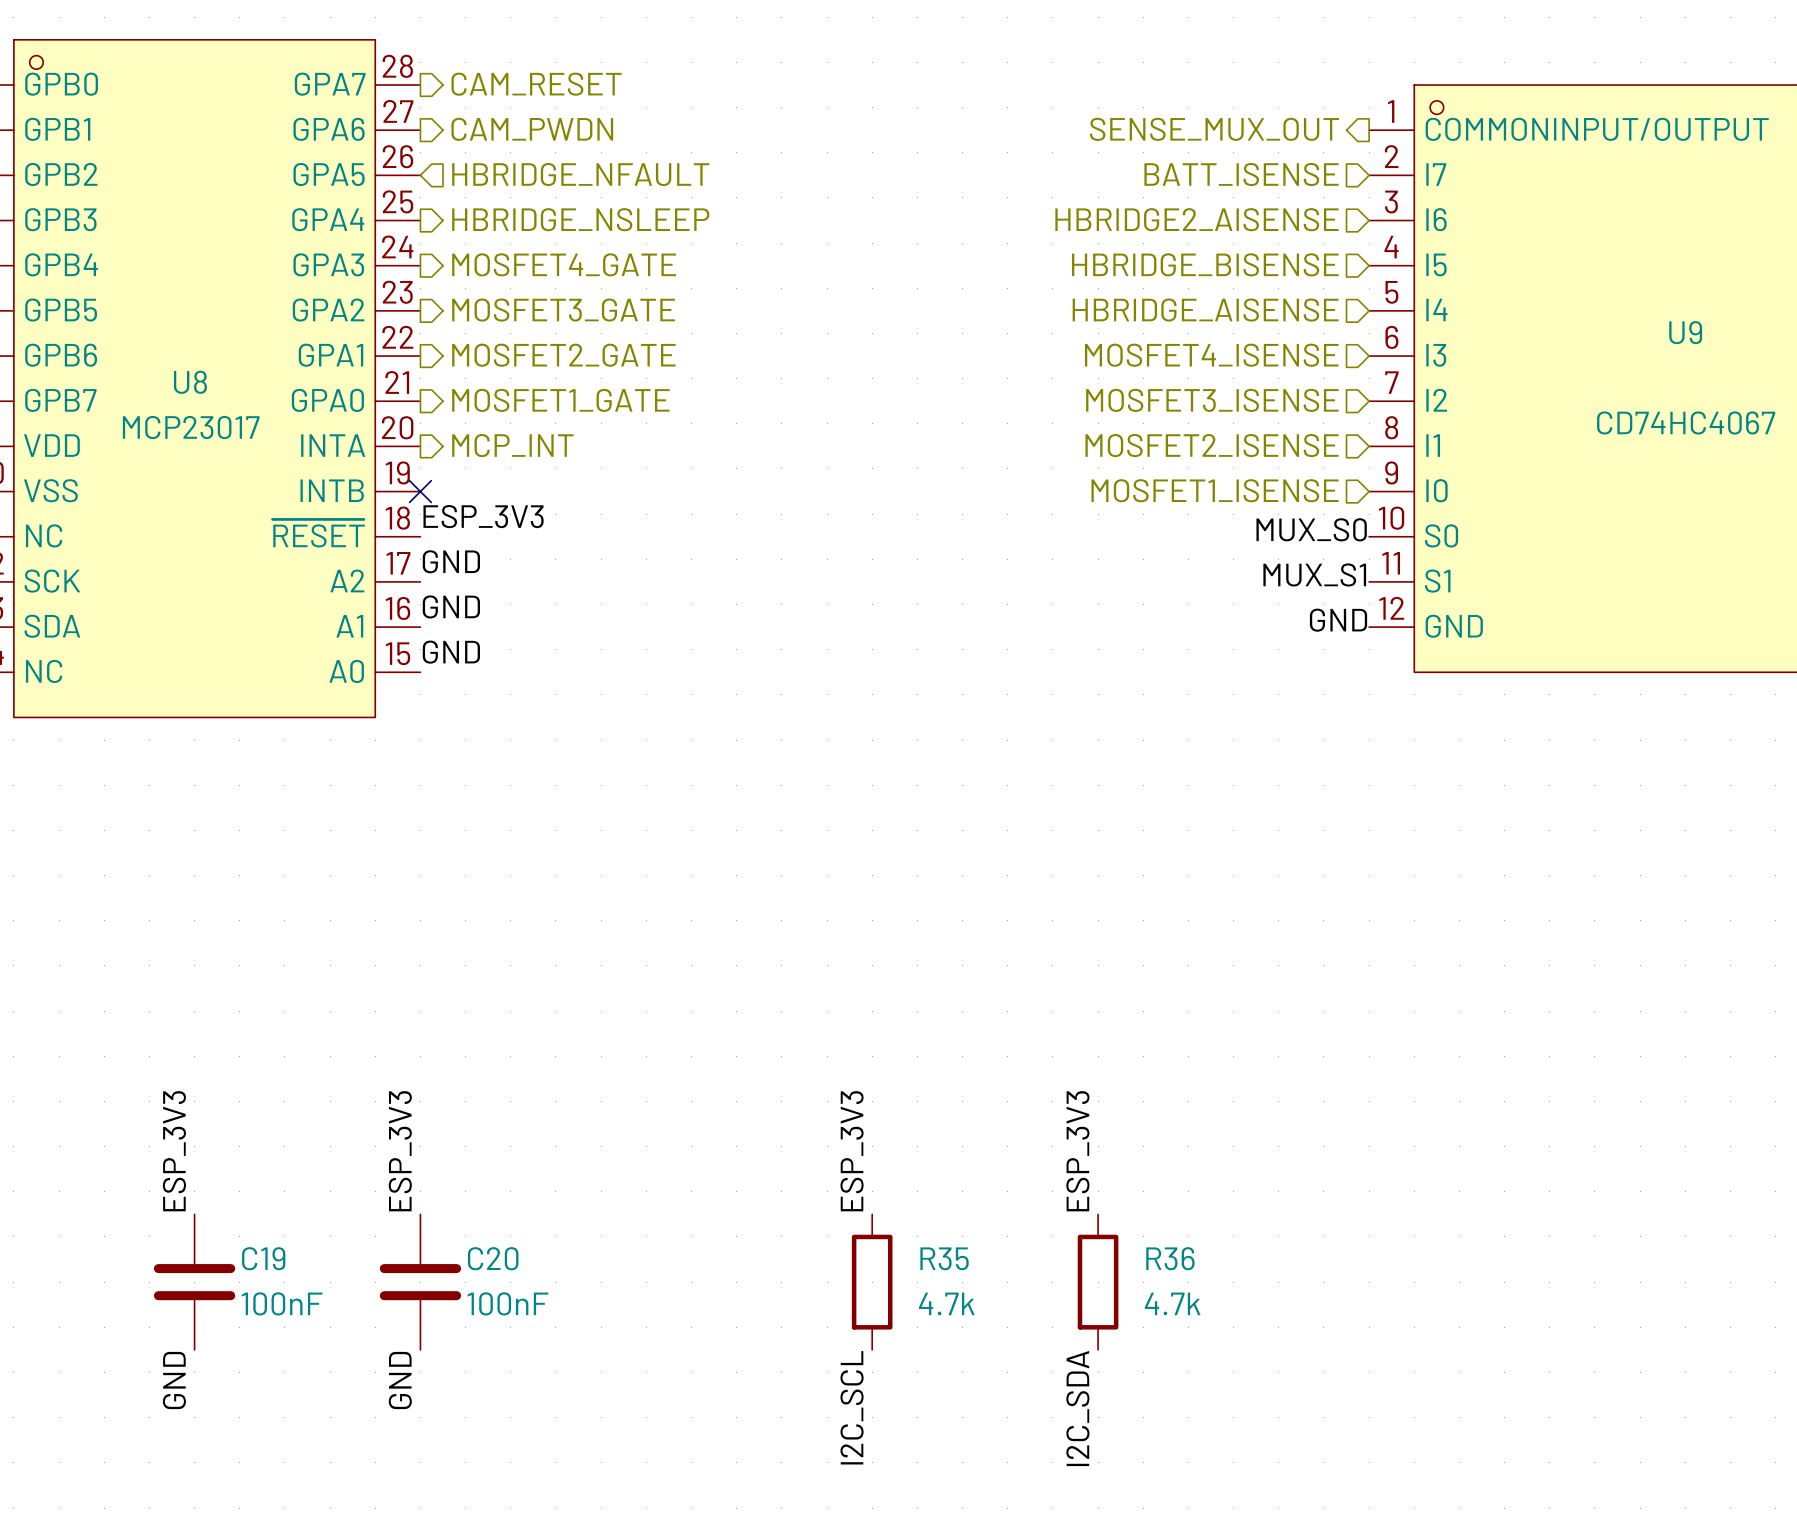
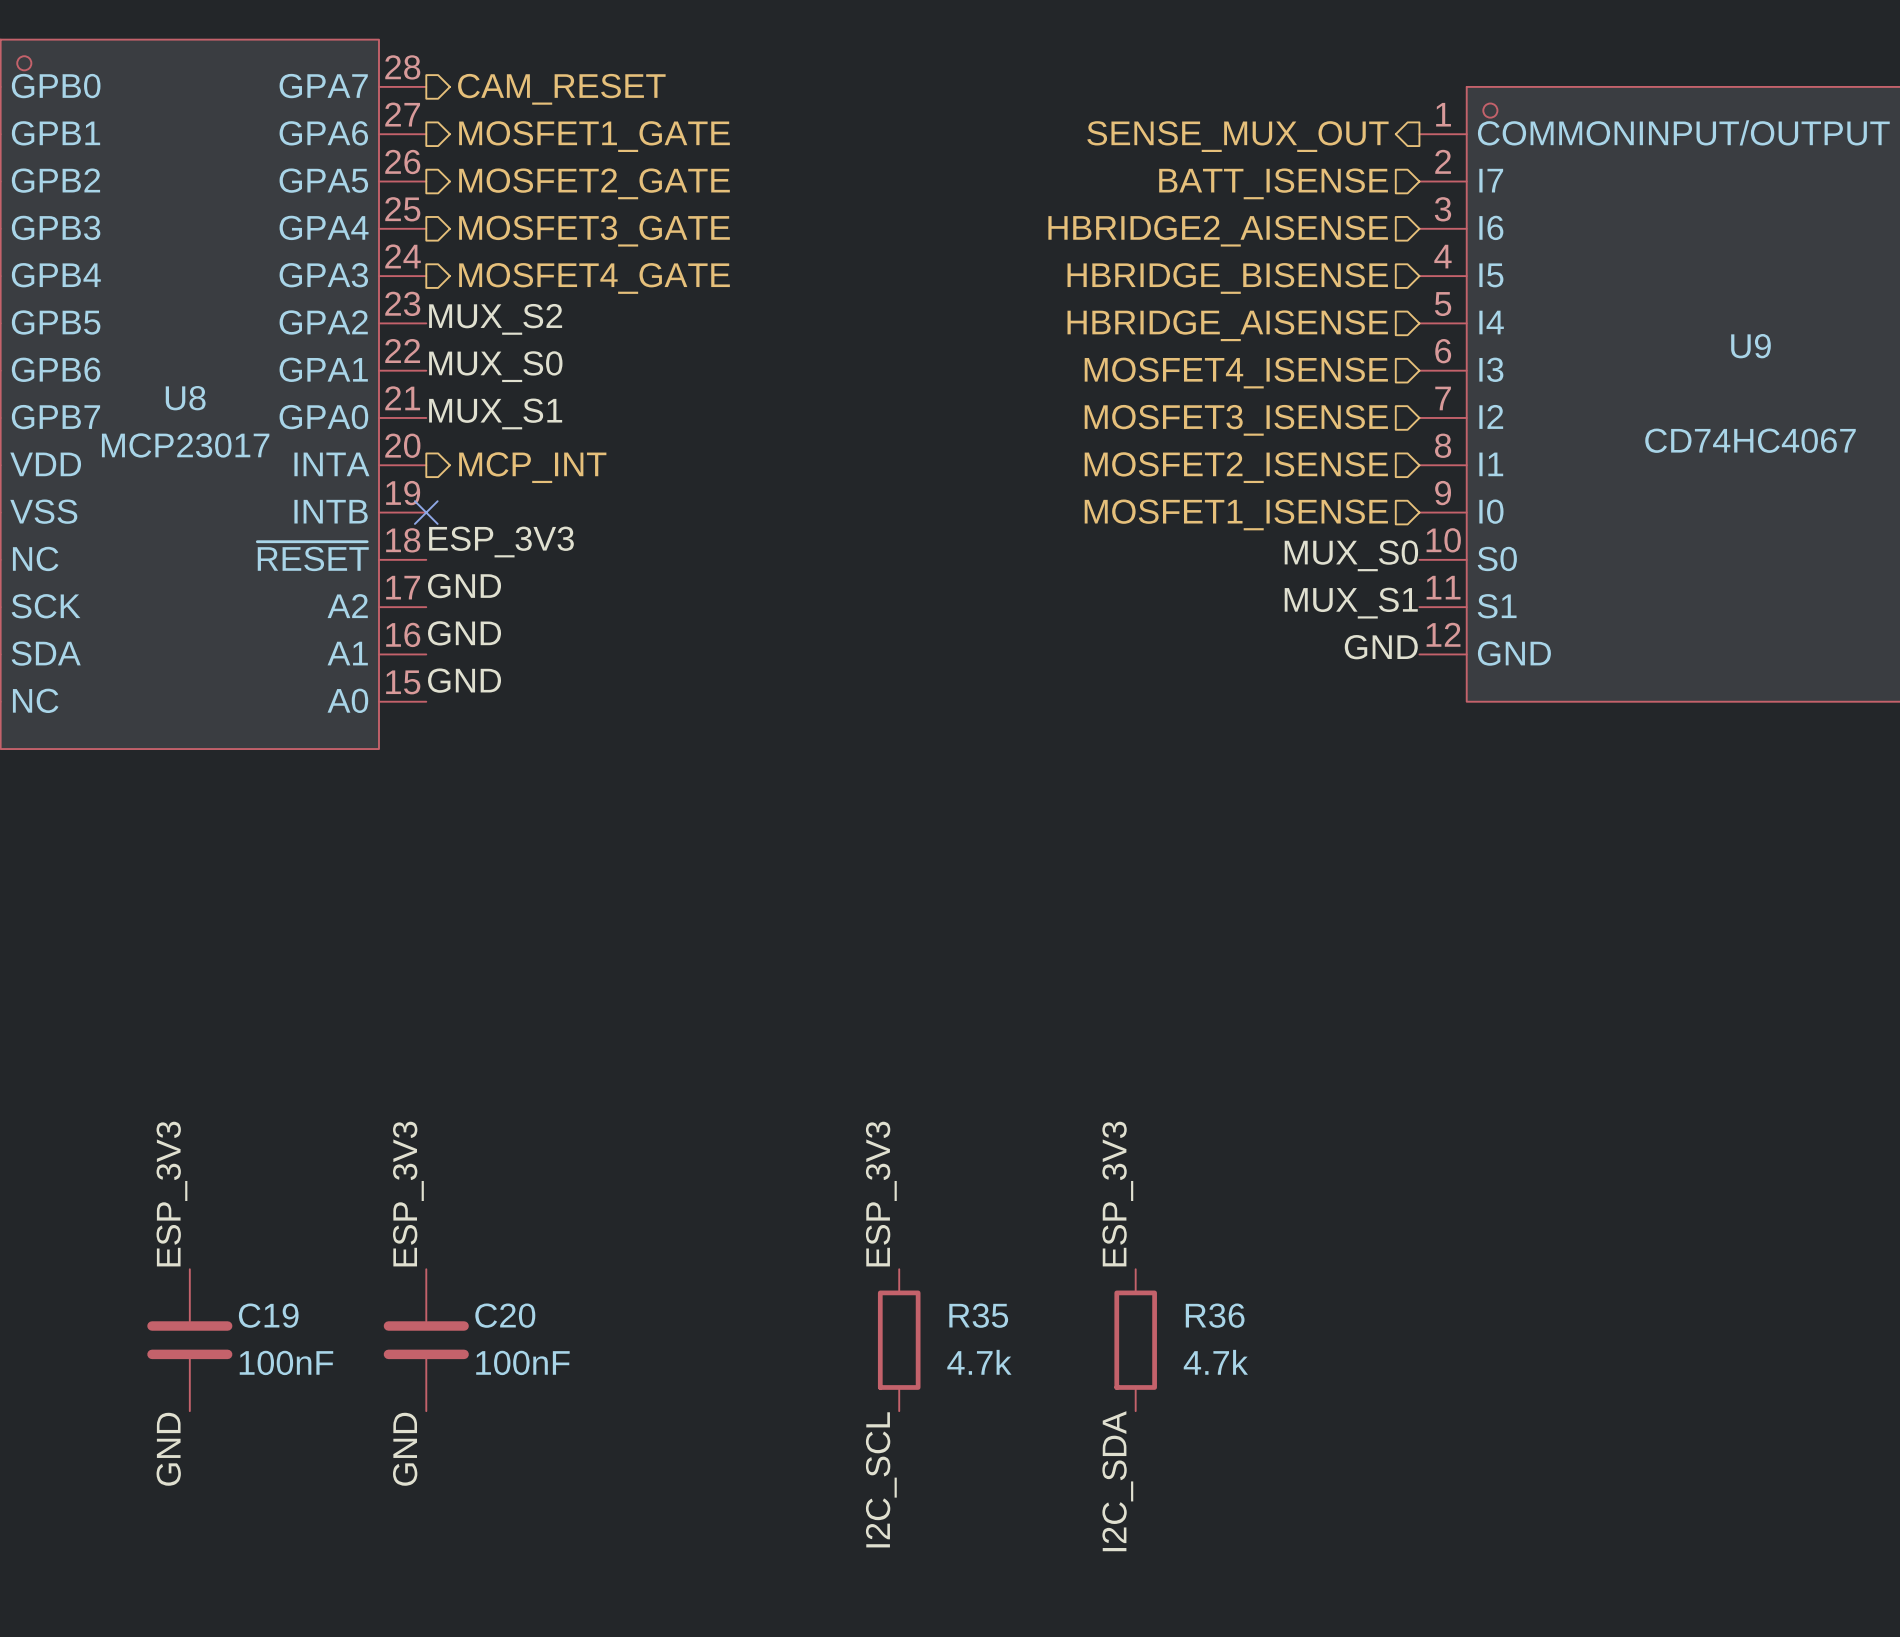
hierarchical label: CAM_PWDN (532, 129) -> MOSFET1_GATE (594, 136)
hierarchical label shape: input (580, 174) -> output (594, 183)
hierarchical label: HBRIDGE_NFAULT (580, 174) -> MOSFET2_GATE (594, 183)
hierarchical label: HBRIDGE_NSLEEP (580, 219) -> MOSFET3_GATE (594, 231)
label: none -> MUX_S2 (495, 319)
hierarchical label: MOSFET3_GATE (563, 310) -> none
label: none -> MUX_S0 (495, 366)
hierarchical label: MOSFET2_GATE (563, 355) -> none
label: none -> MUX_S1 (495, 413)
hierarchical label: MOSFET1_GATE (560, 400) -> none

